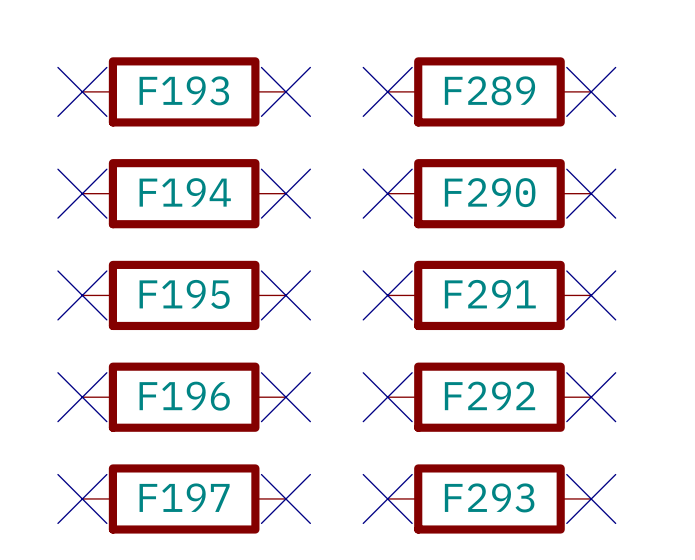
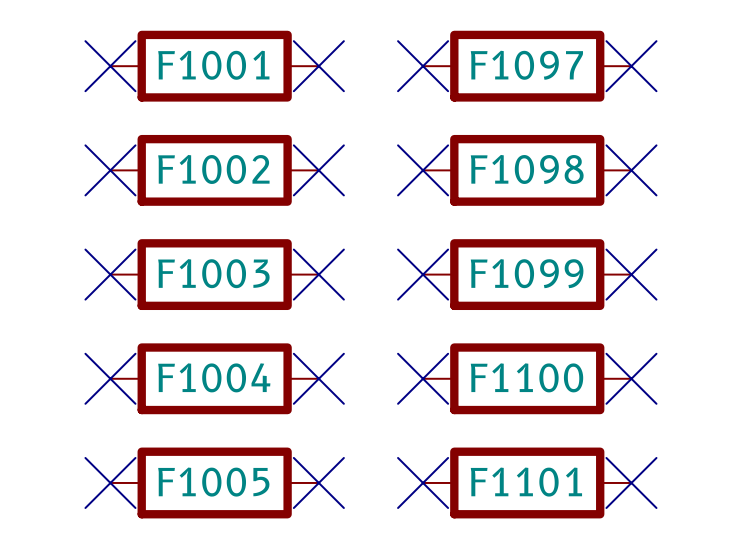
F193 name: F193 (184, 90) -> F1001 (213, 65)
F289 name: F289 (489, 90) -> F1097 (526, 65)
F194 name: F194 (185, 192) -> F1002 (213, 169)
F290 name: F290 (490, 192) -> F1098 (527, 169)
F195 name: F195 (184, 294) -> F1003 (213, 273)
F291 name: F291 (490, 294) -> F1099 (527, 273)
F292 name: F292 (490, 395) -> F1100 (526, 377)
F196 name: F196 (184, 396) -> F1004 (214, 377)
F197 name: F197 (184, 497) -> F1005 (213, 482)
F293 name: F293 (489, 497) -> F1101 (526, 482)

